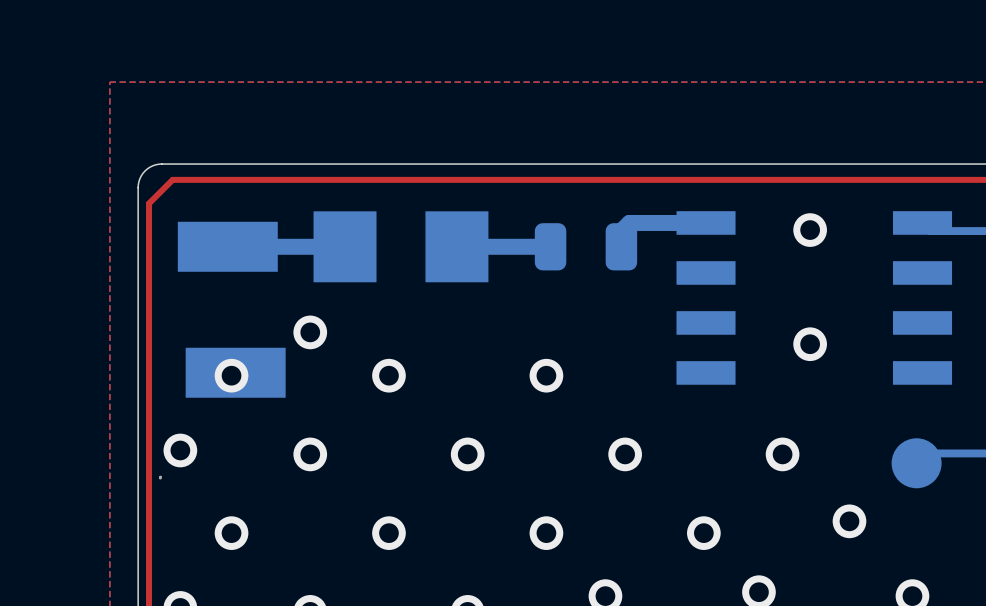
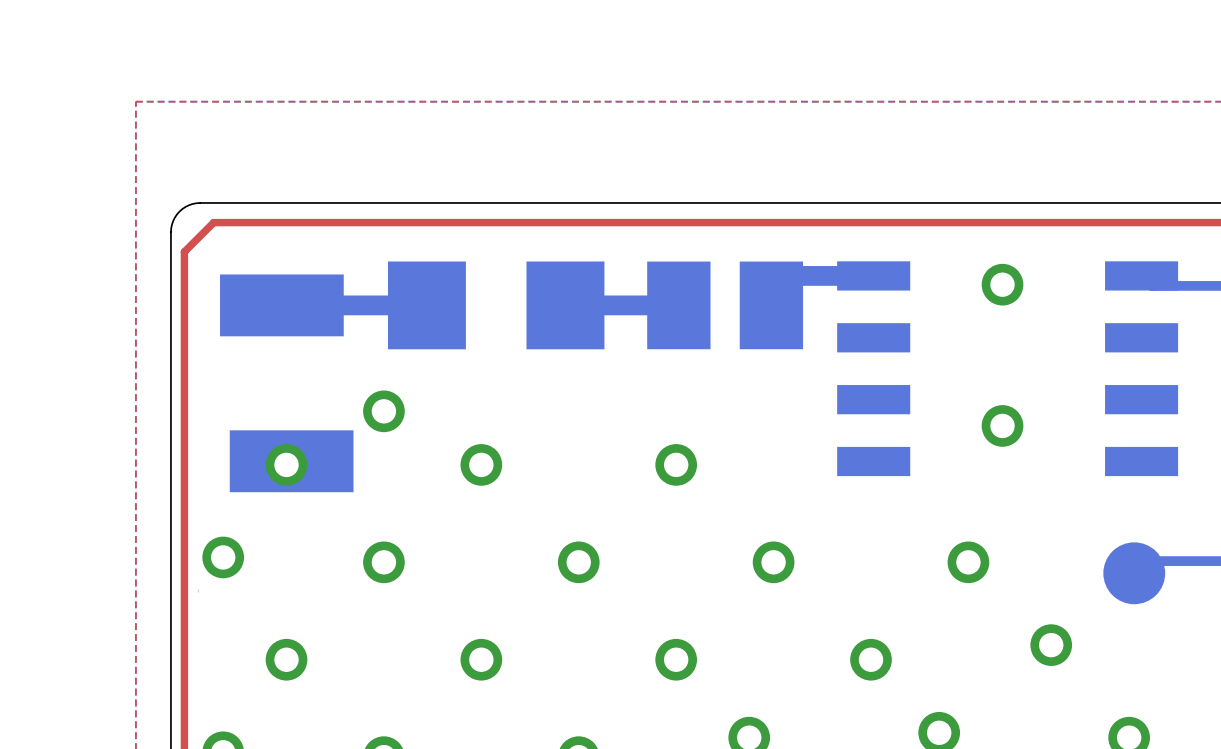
part footprint: [534, 223, 638, 271] -> [647, 261, 804, 350]

